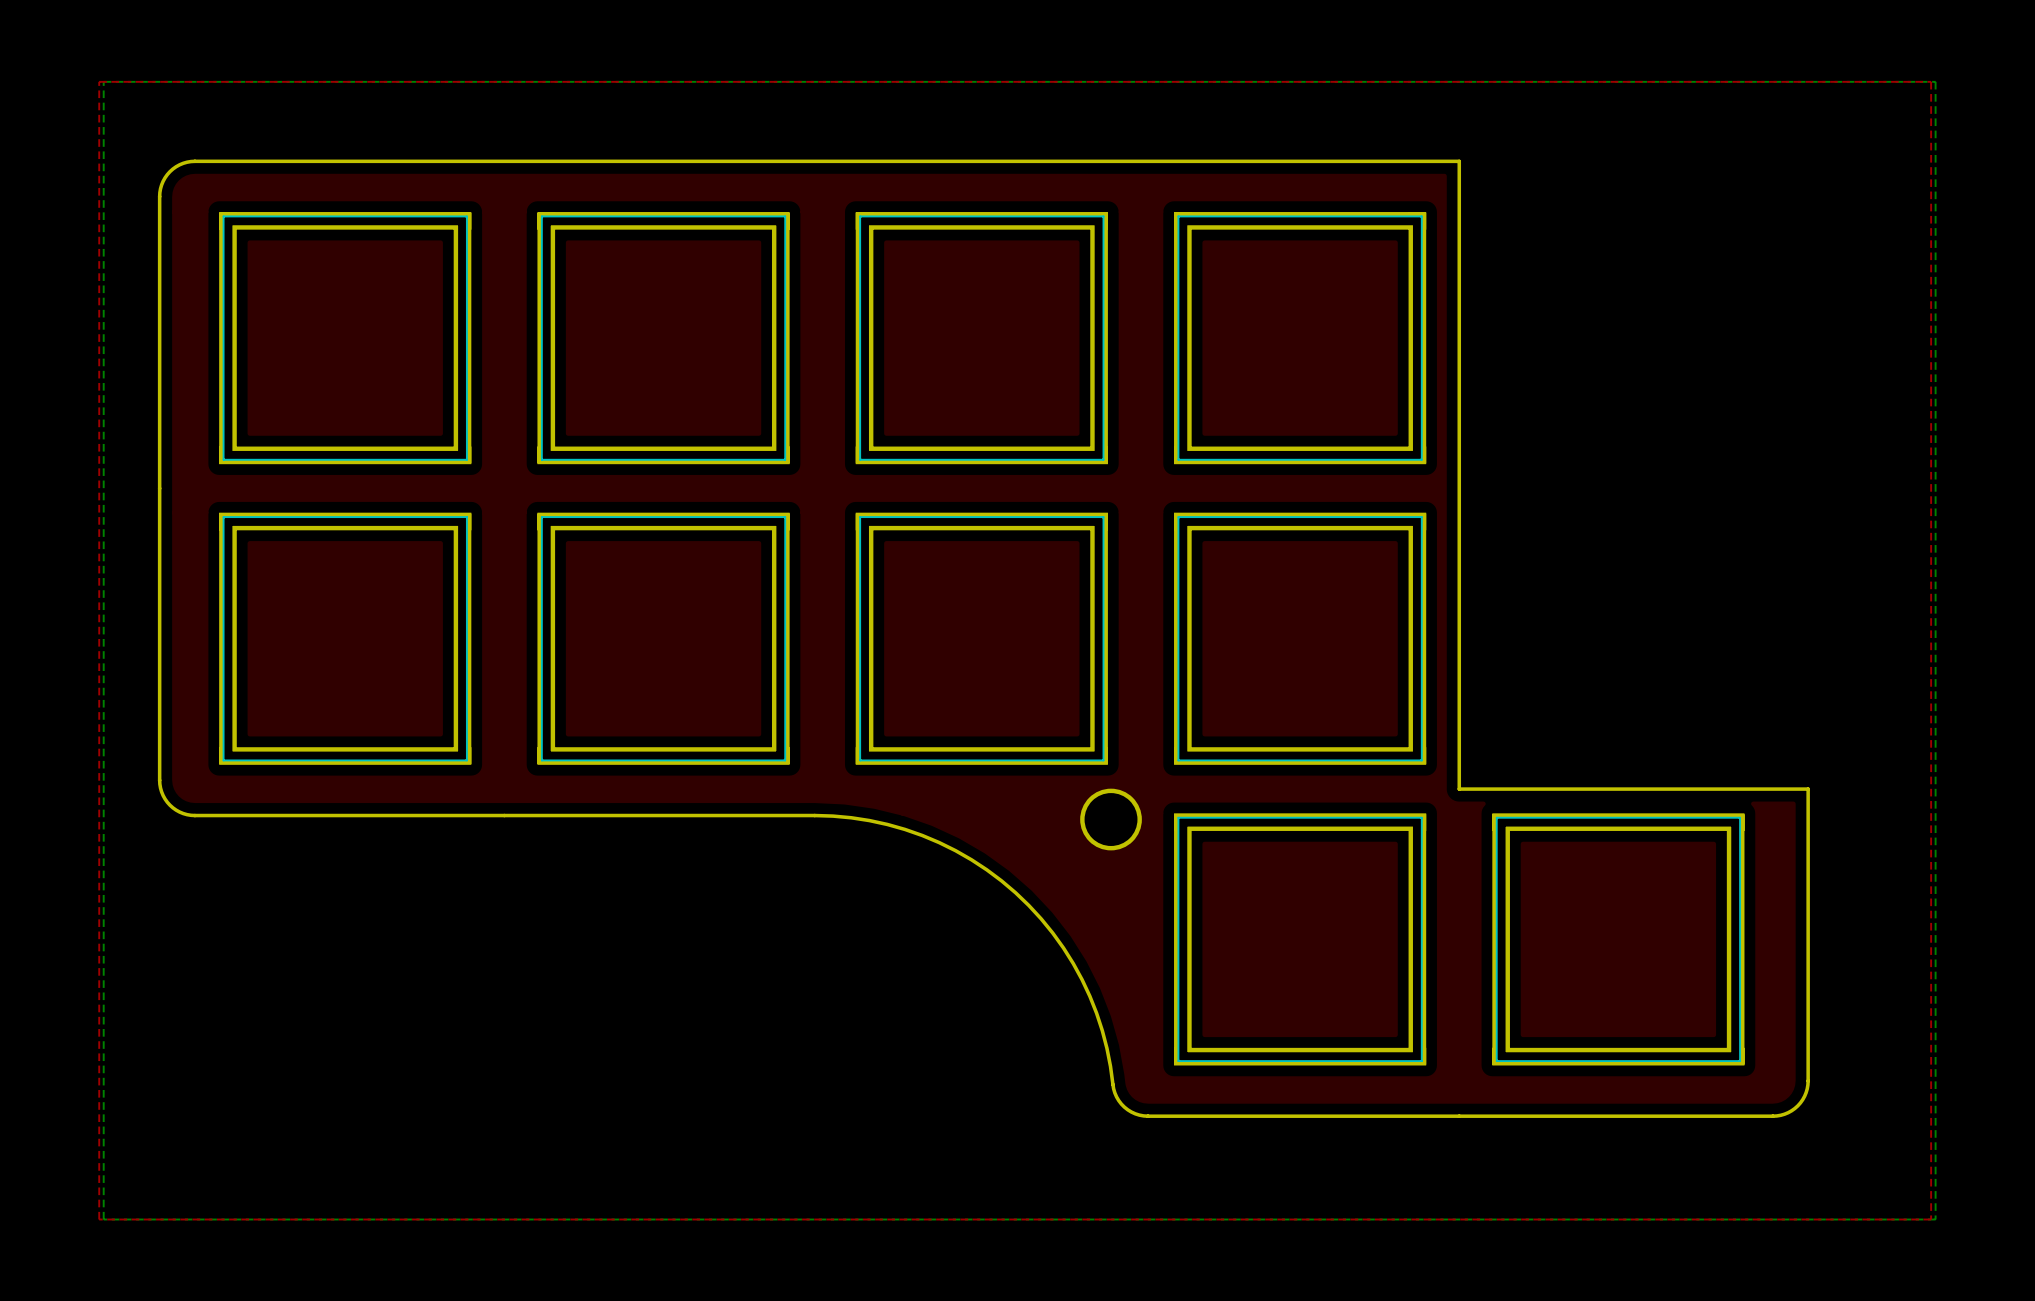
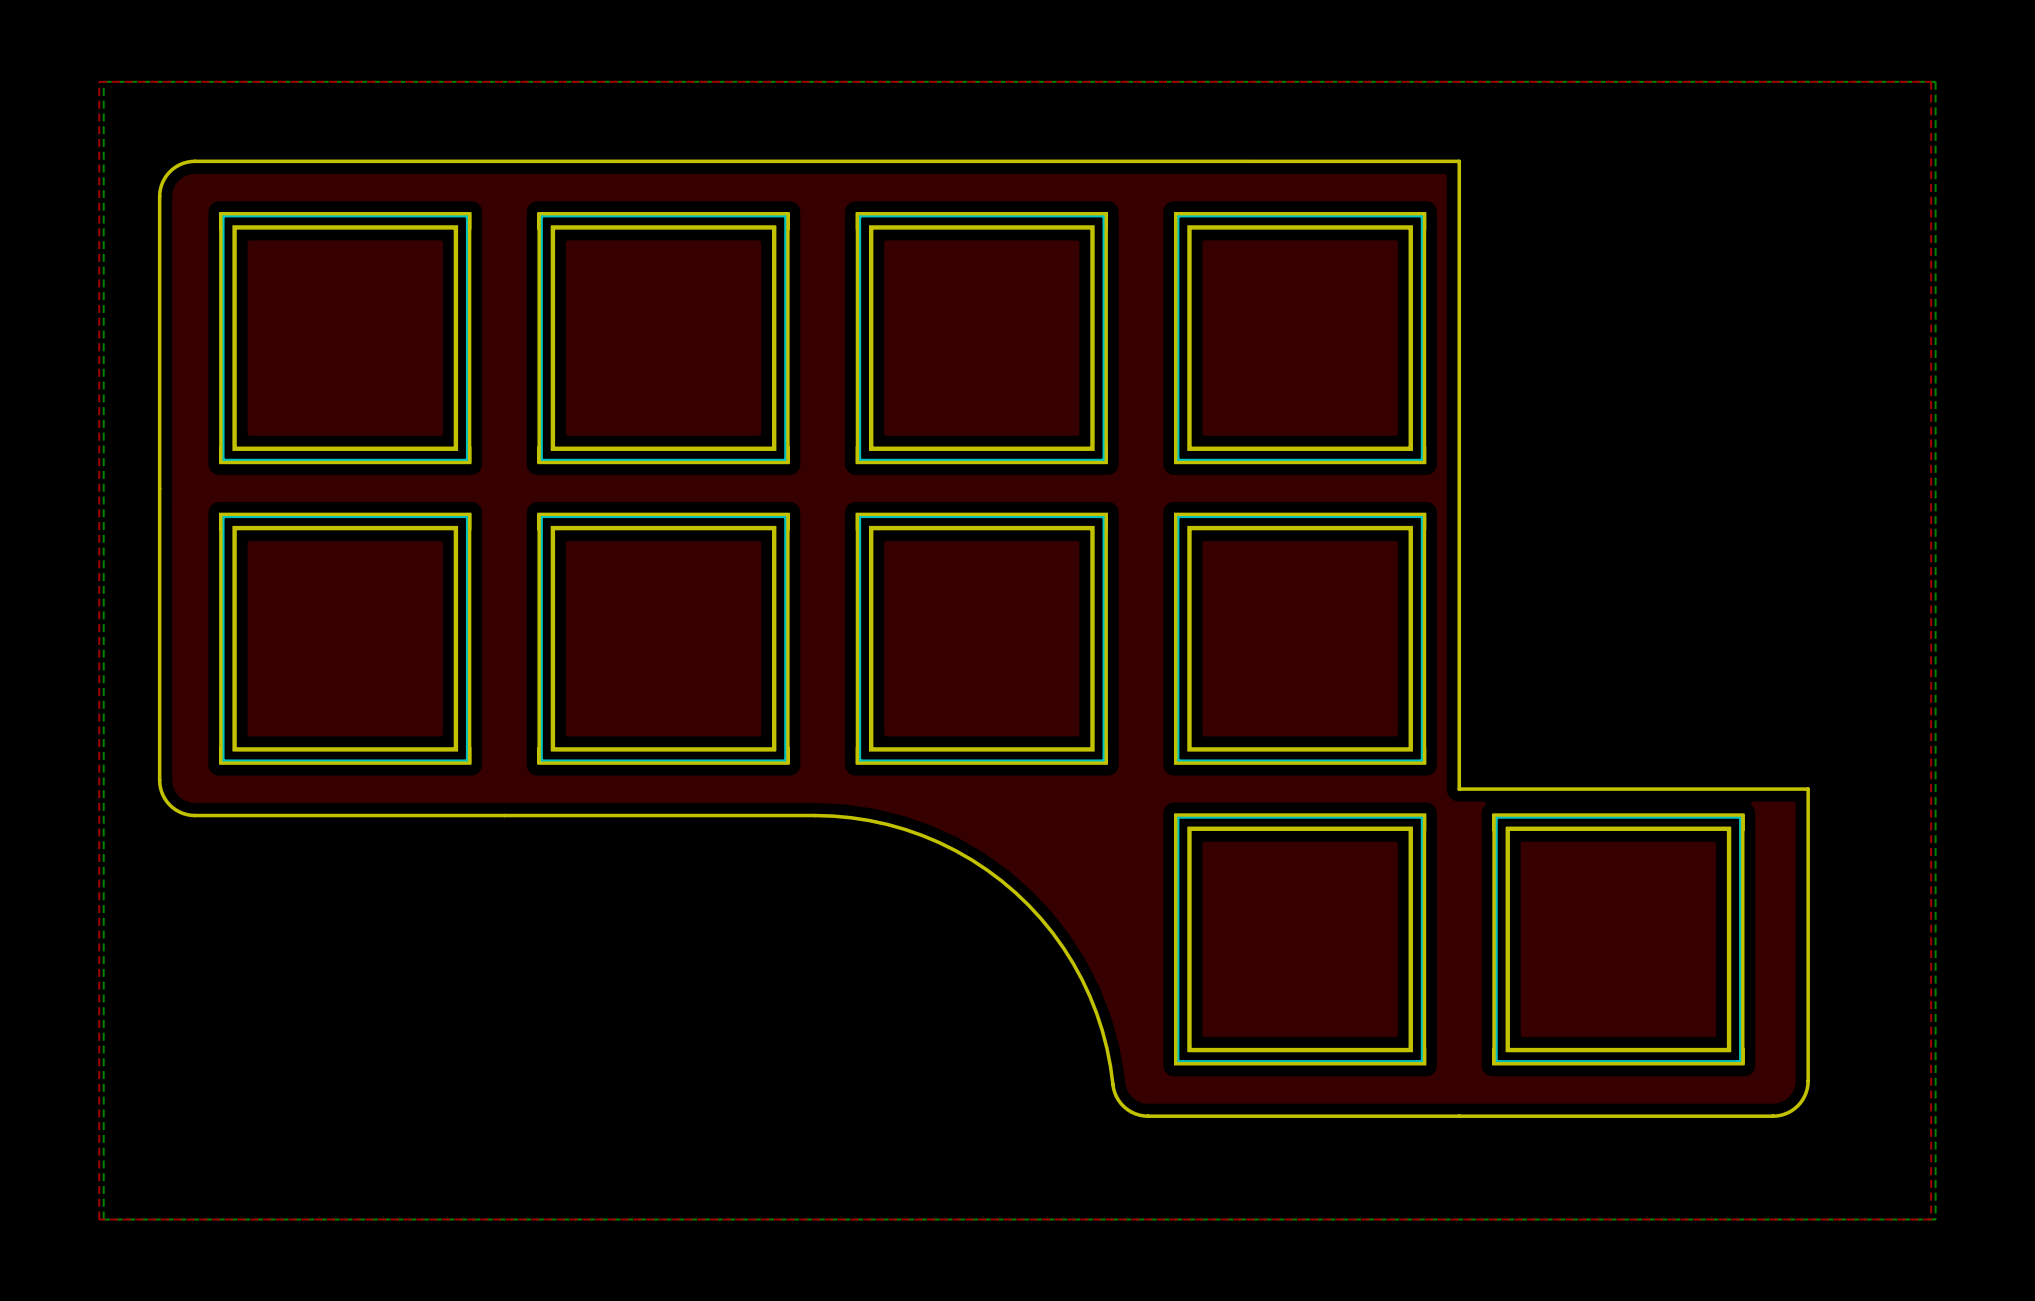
part: (1111, 819) -> none

